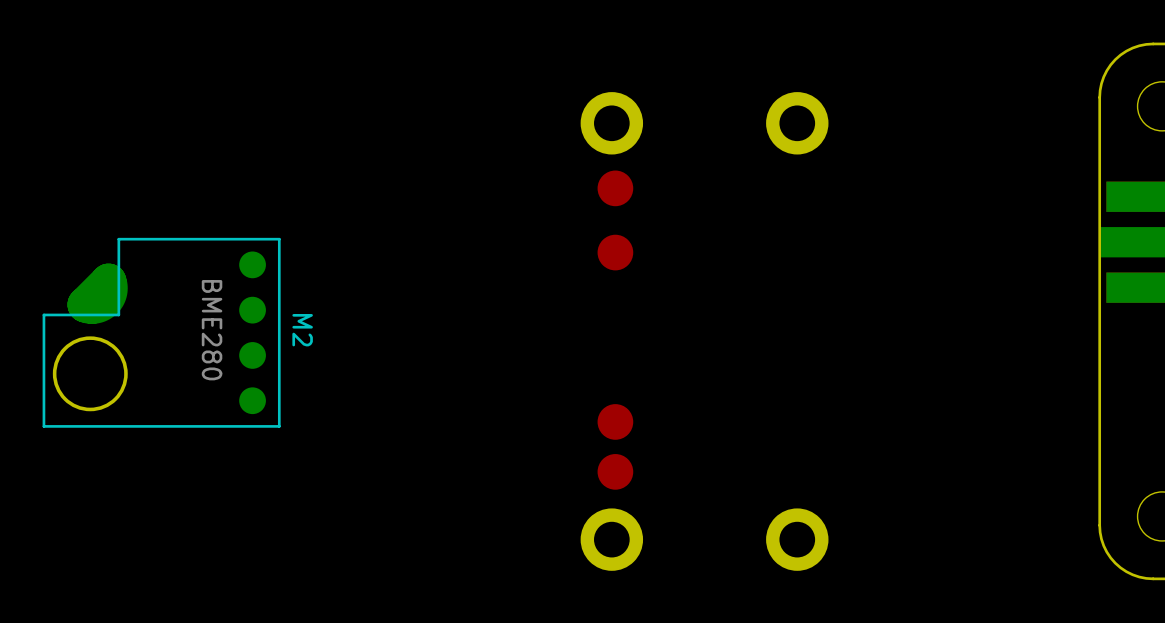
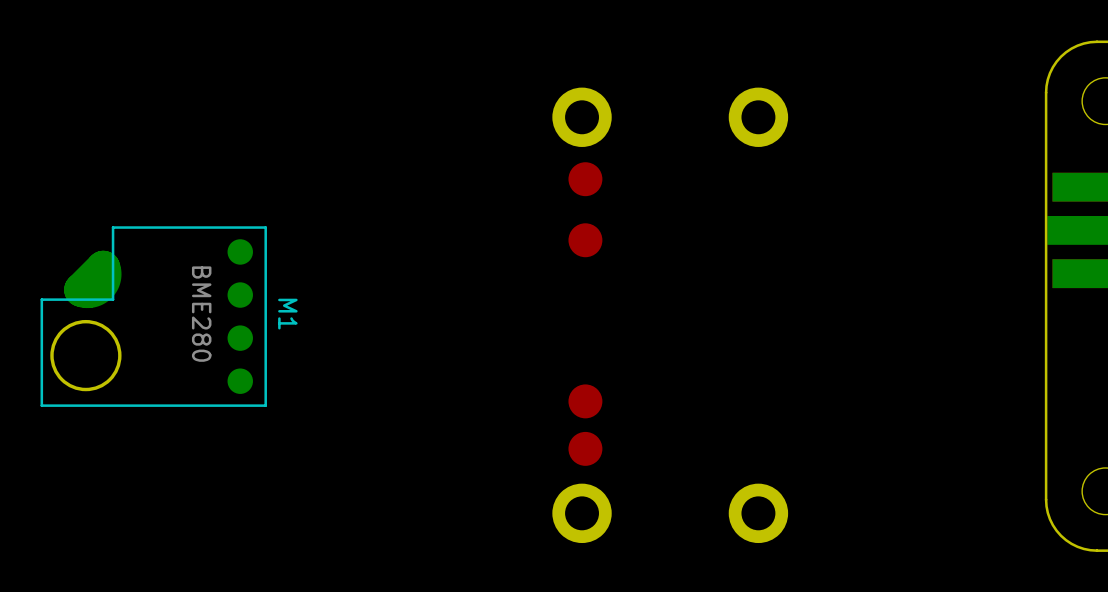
M2 name: M2 (302, 330) -> M1 (287, 314)

